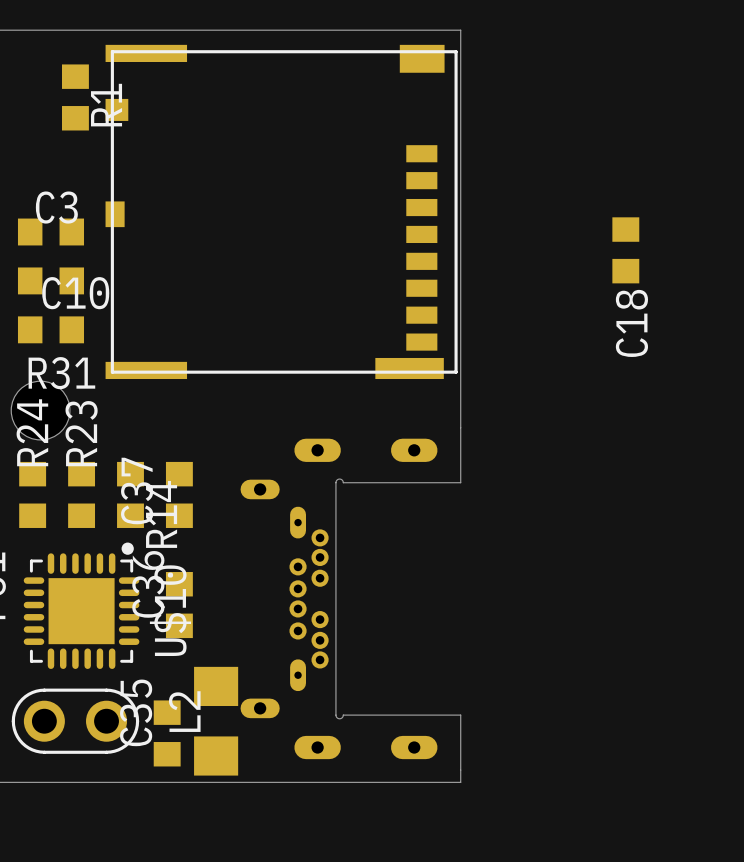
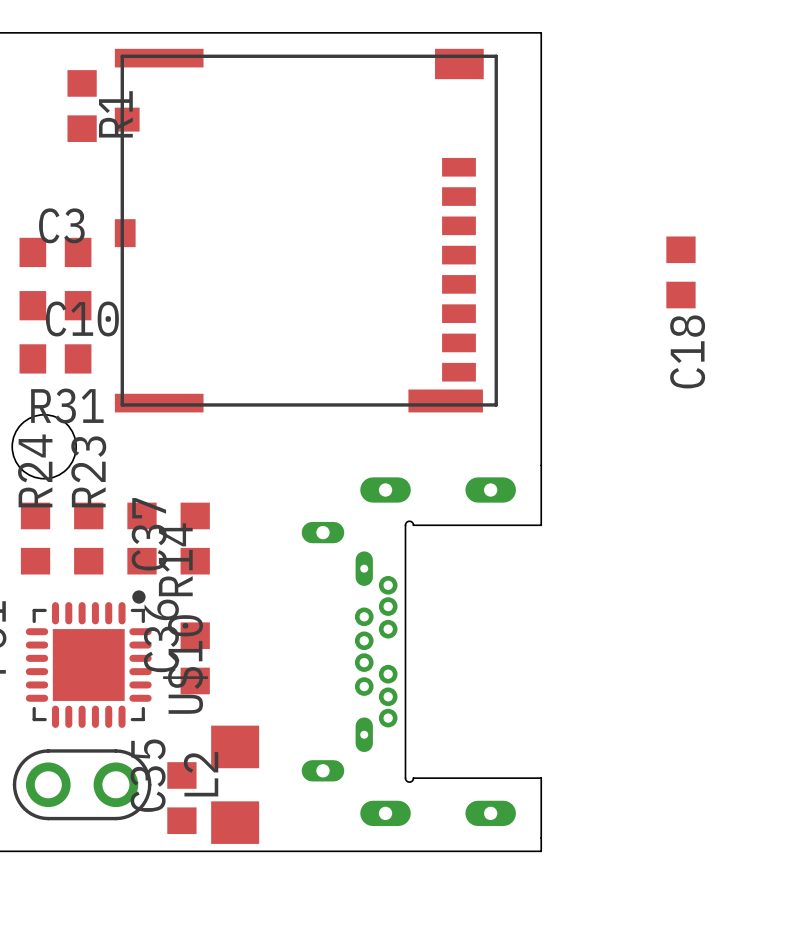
board edge: (460, 30) (460, 427) -> (501, 32) (541, 32) (541, 465)
part position: (350, 598) -> (421, 651)
board edge: (460, 770) (460, 782) -> (541, 838) (541, 851) (501, 851)

